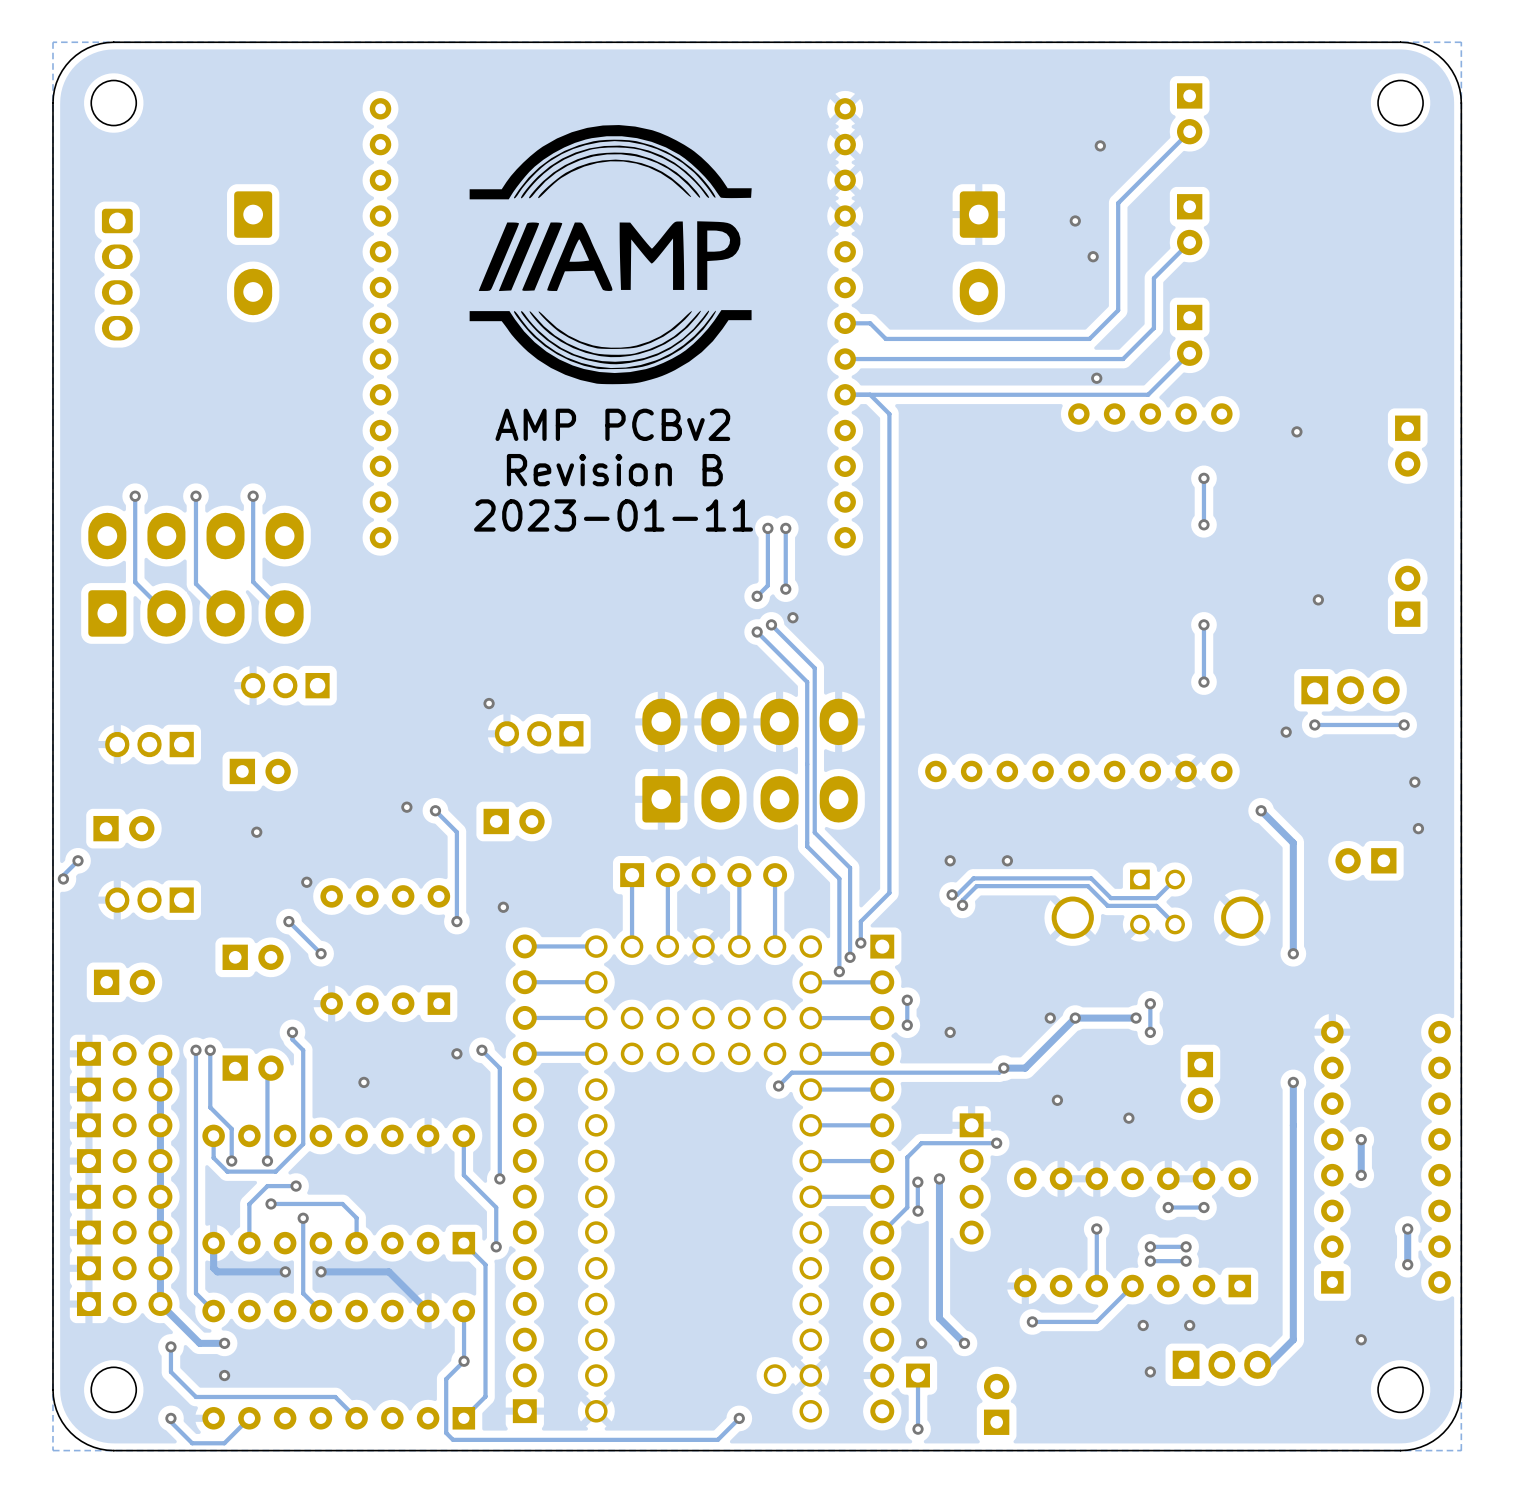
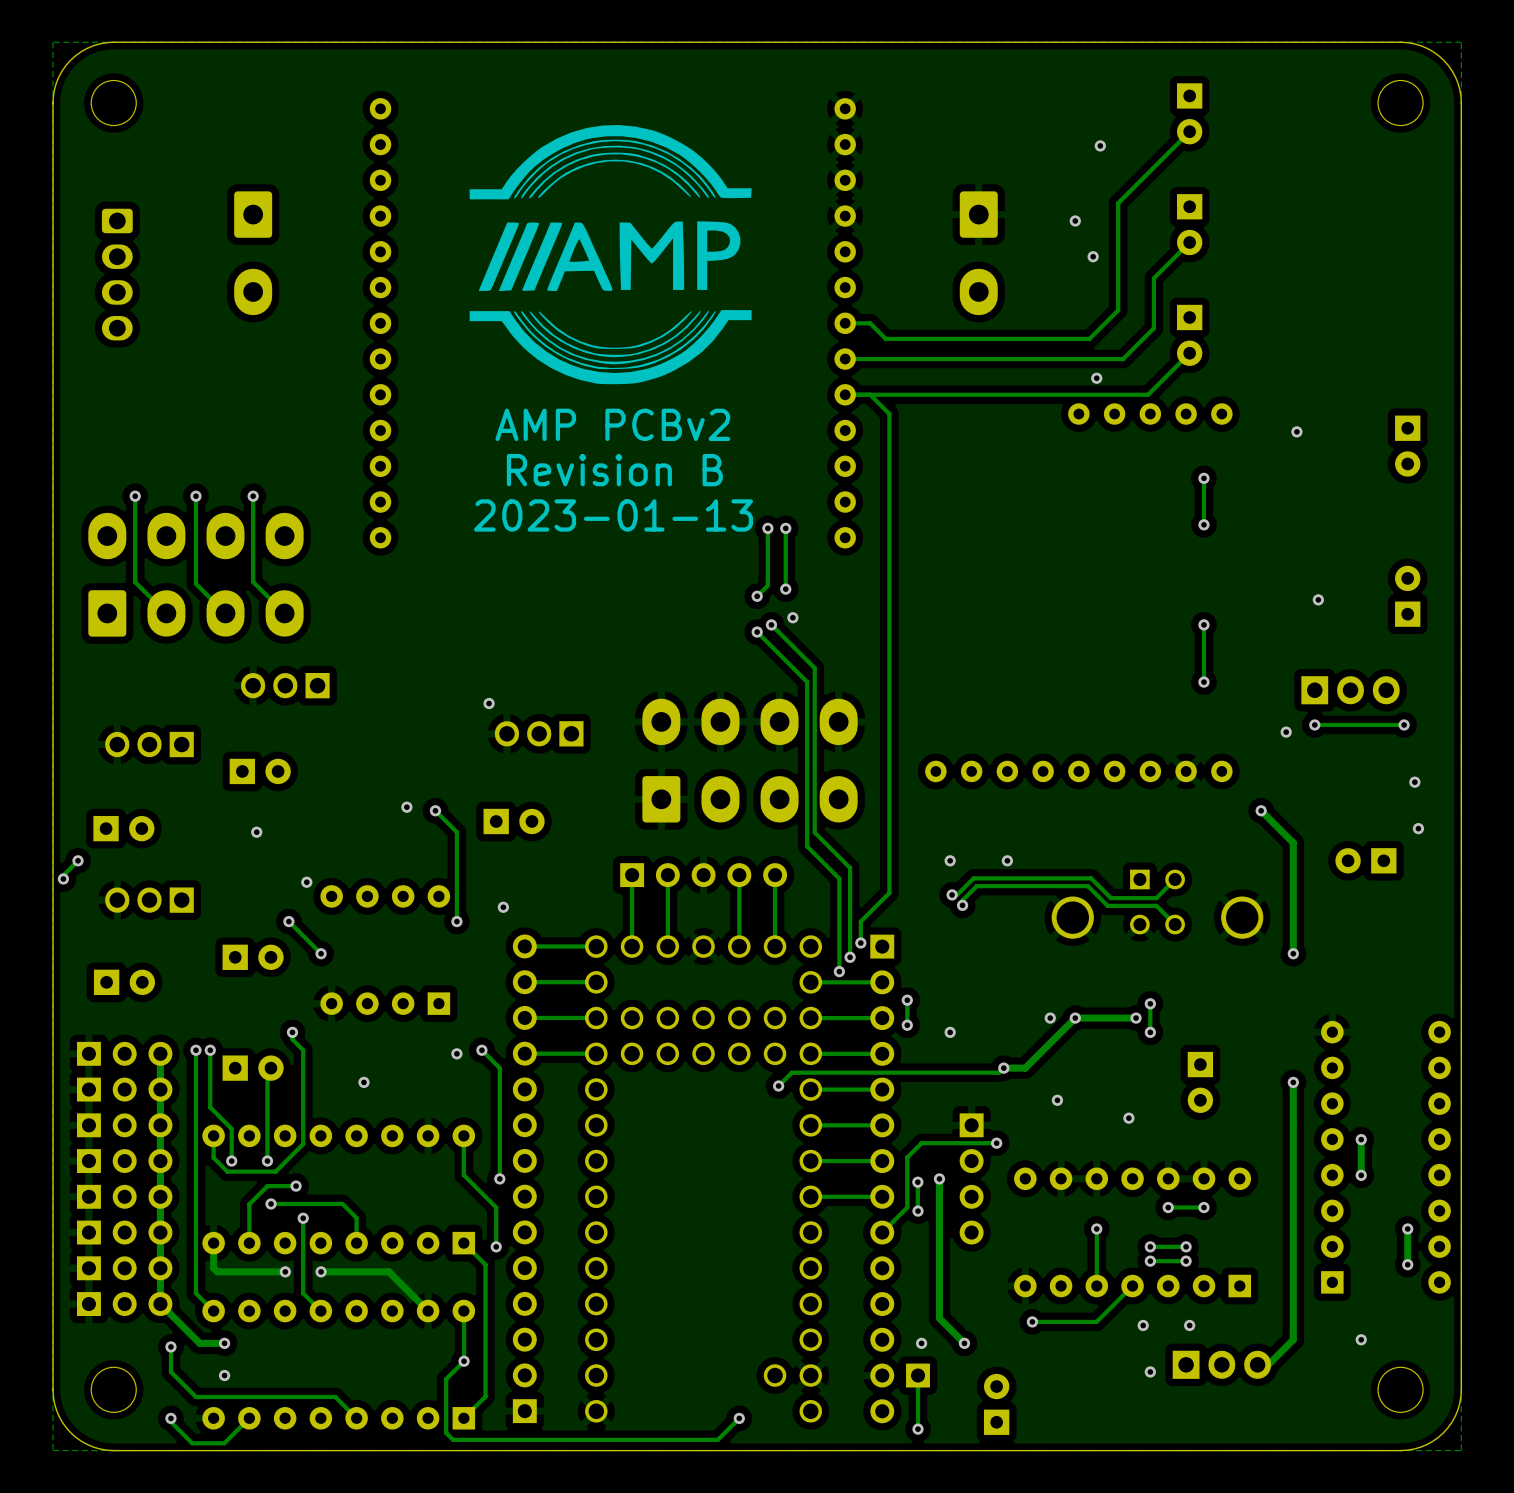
text: 2023-01-11 (613, 515) -> 2023-01-13 (613, 515)

